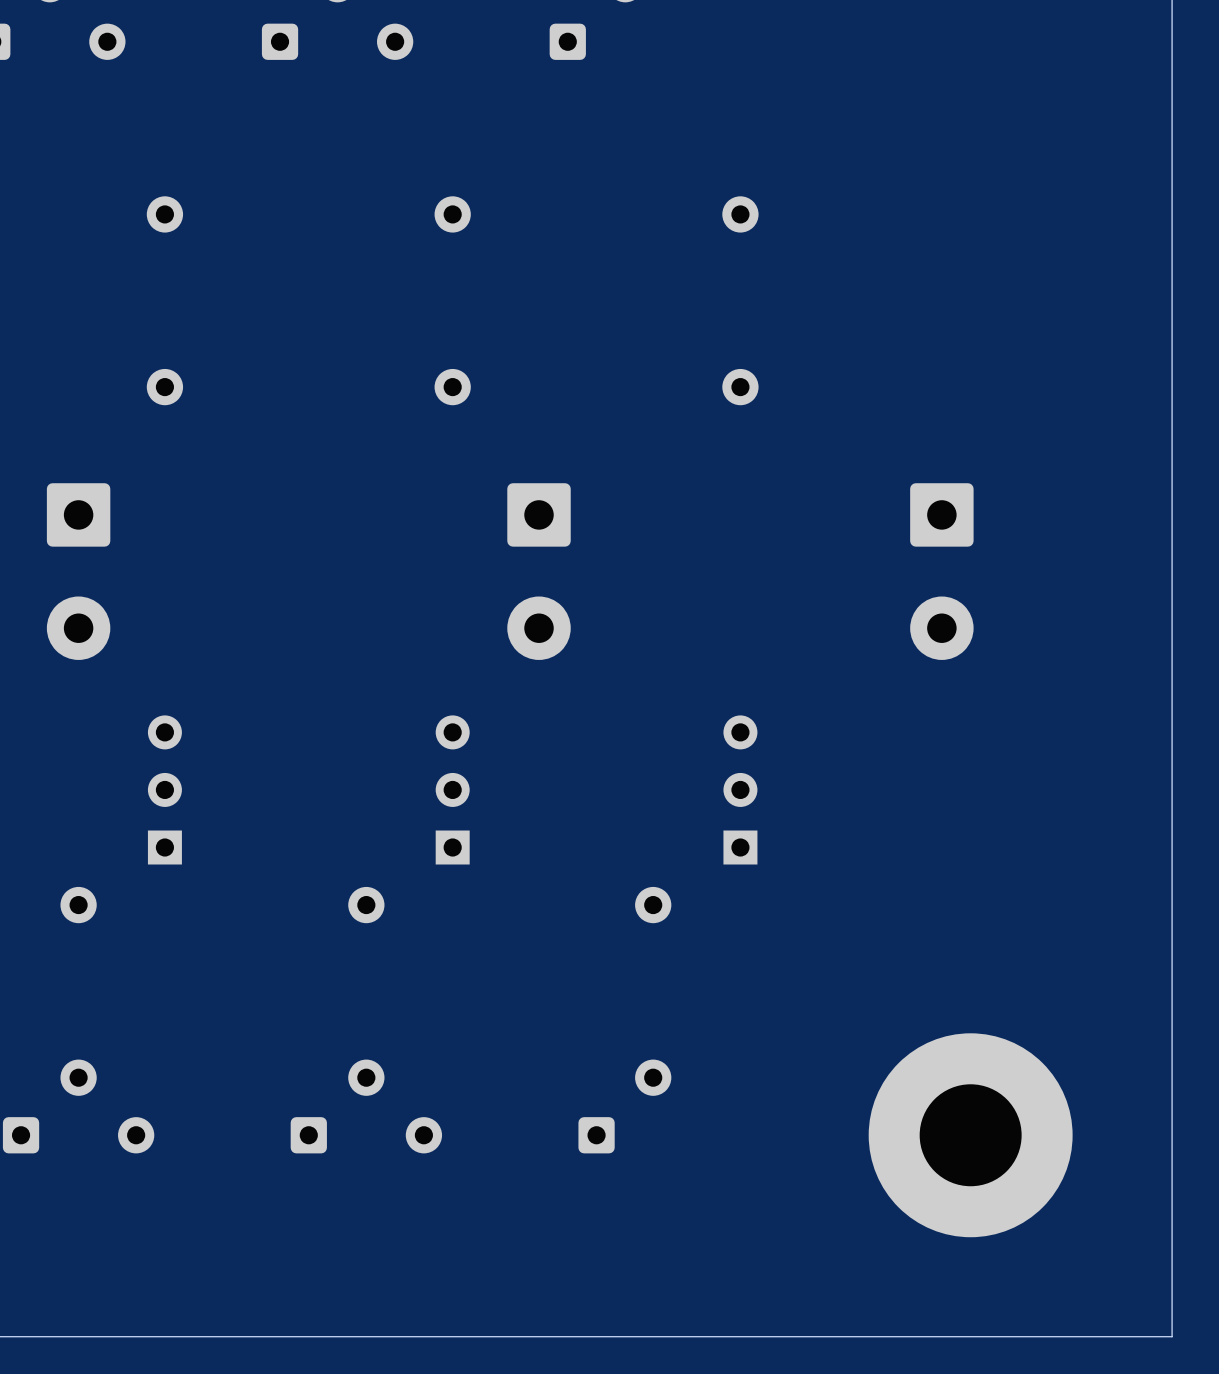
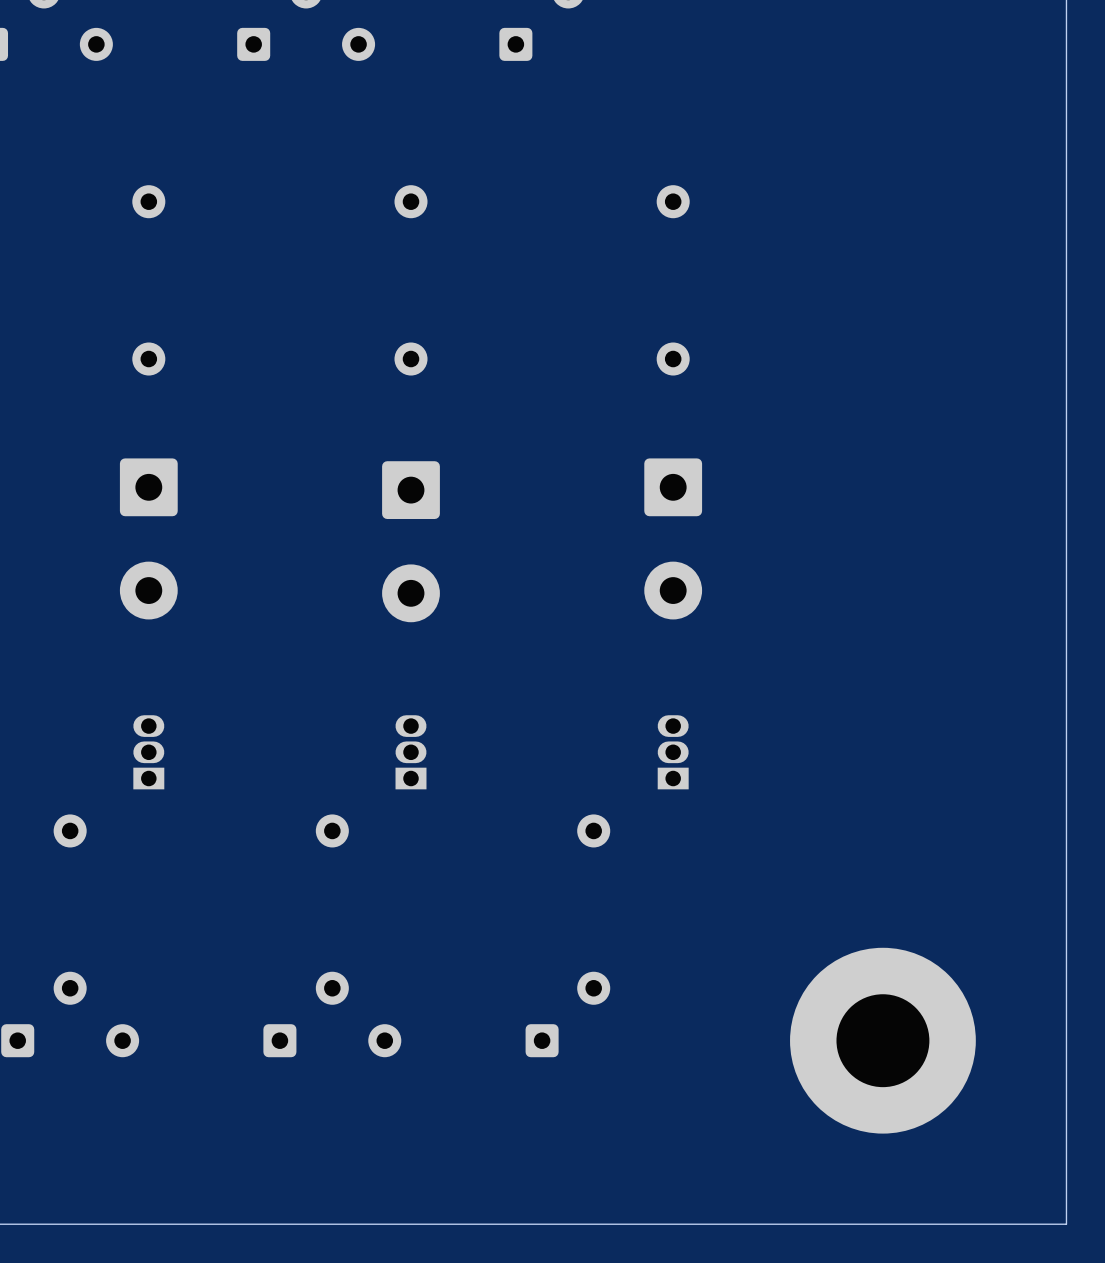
part position: (78, 571) -> (148, 538)
part position: (539, 571) -> (411, 541)
part: (941, 571) -> none
part: none -> (673, 538)
part: (164, 789) -> none
part: (452, 789) -> none
part: (740, 789) -> none
part: none -> (148, 752)
part: none -> (411, 752)
part: none -> (673, 752)

